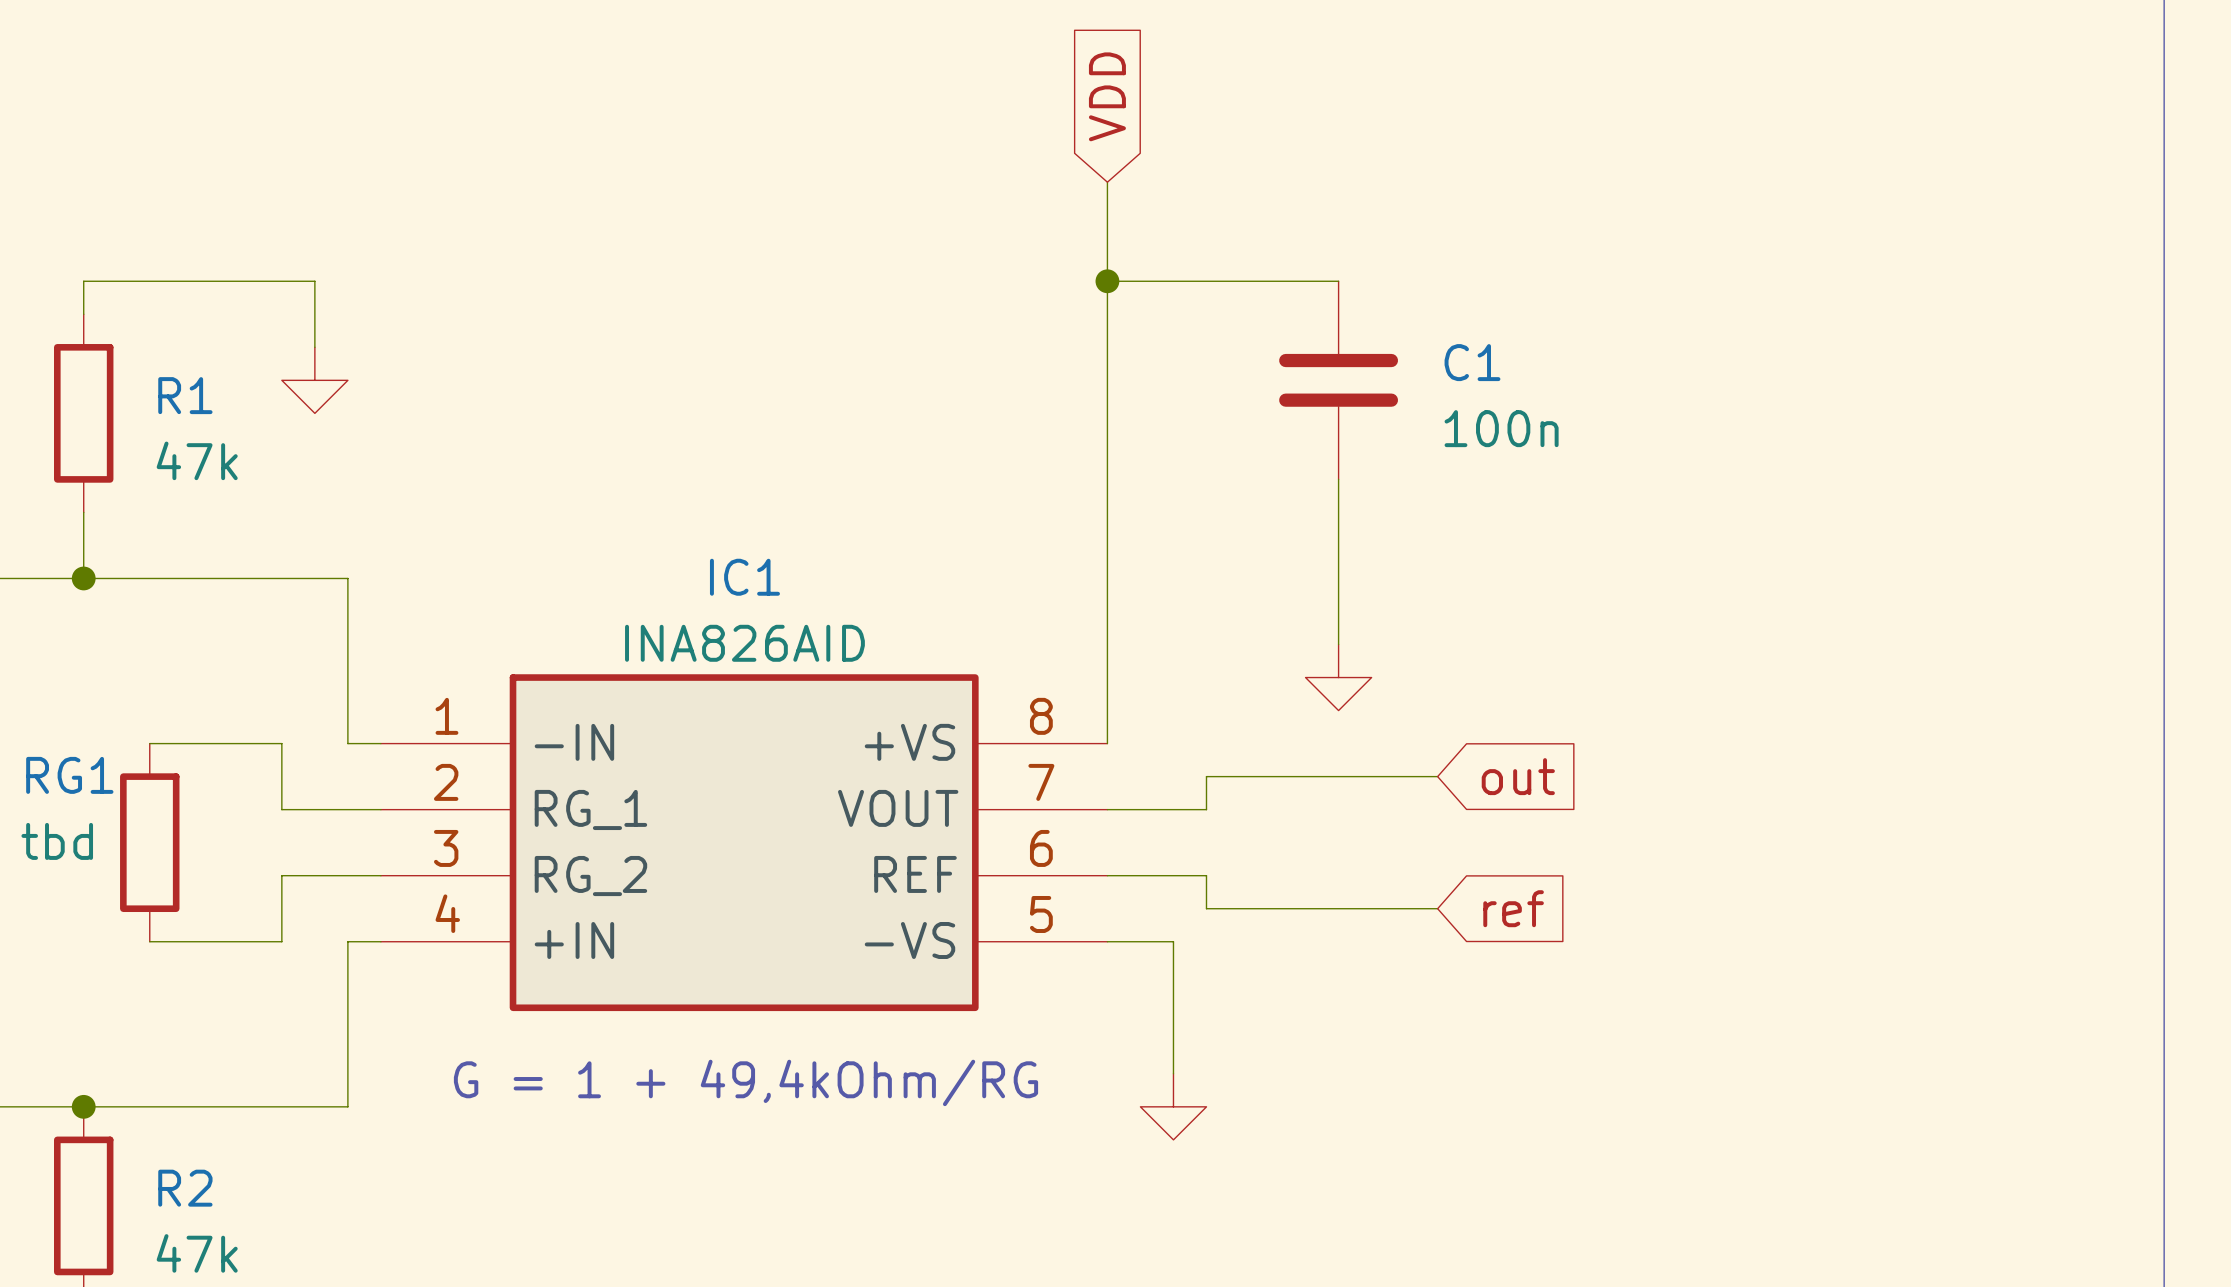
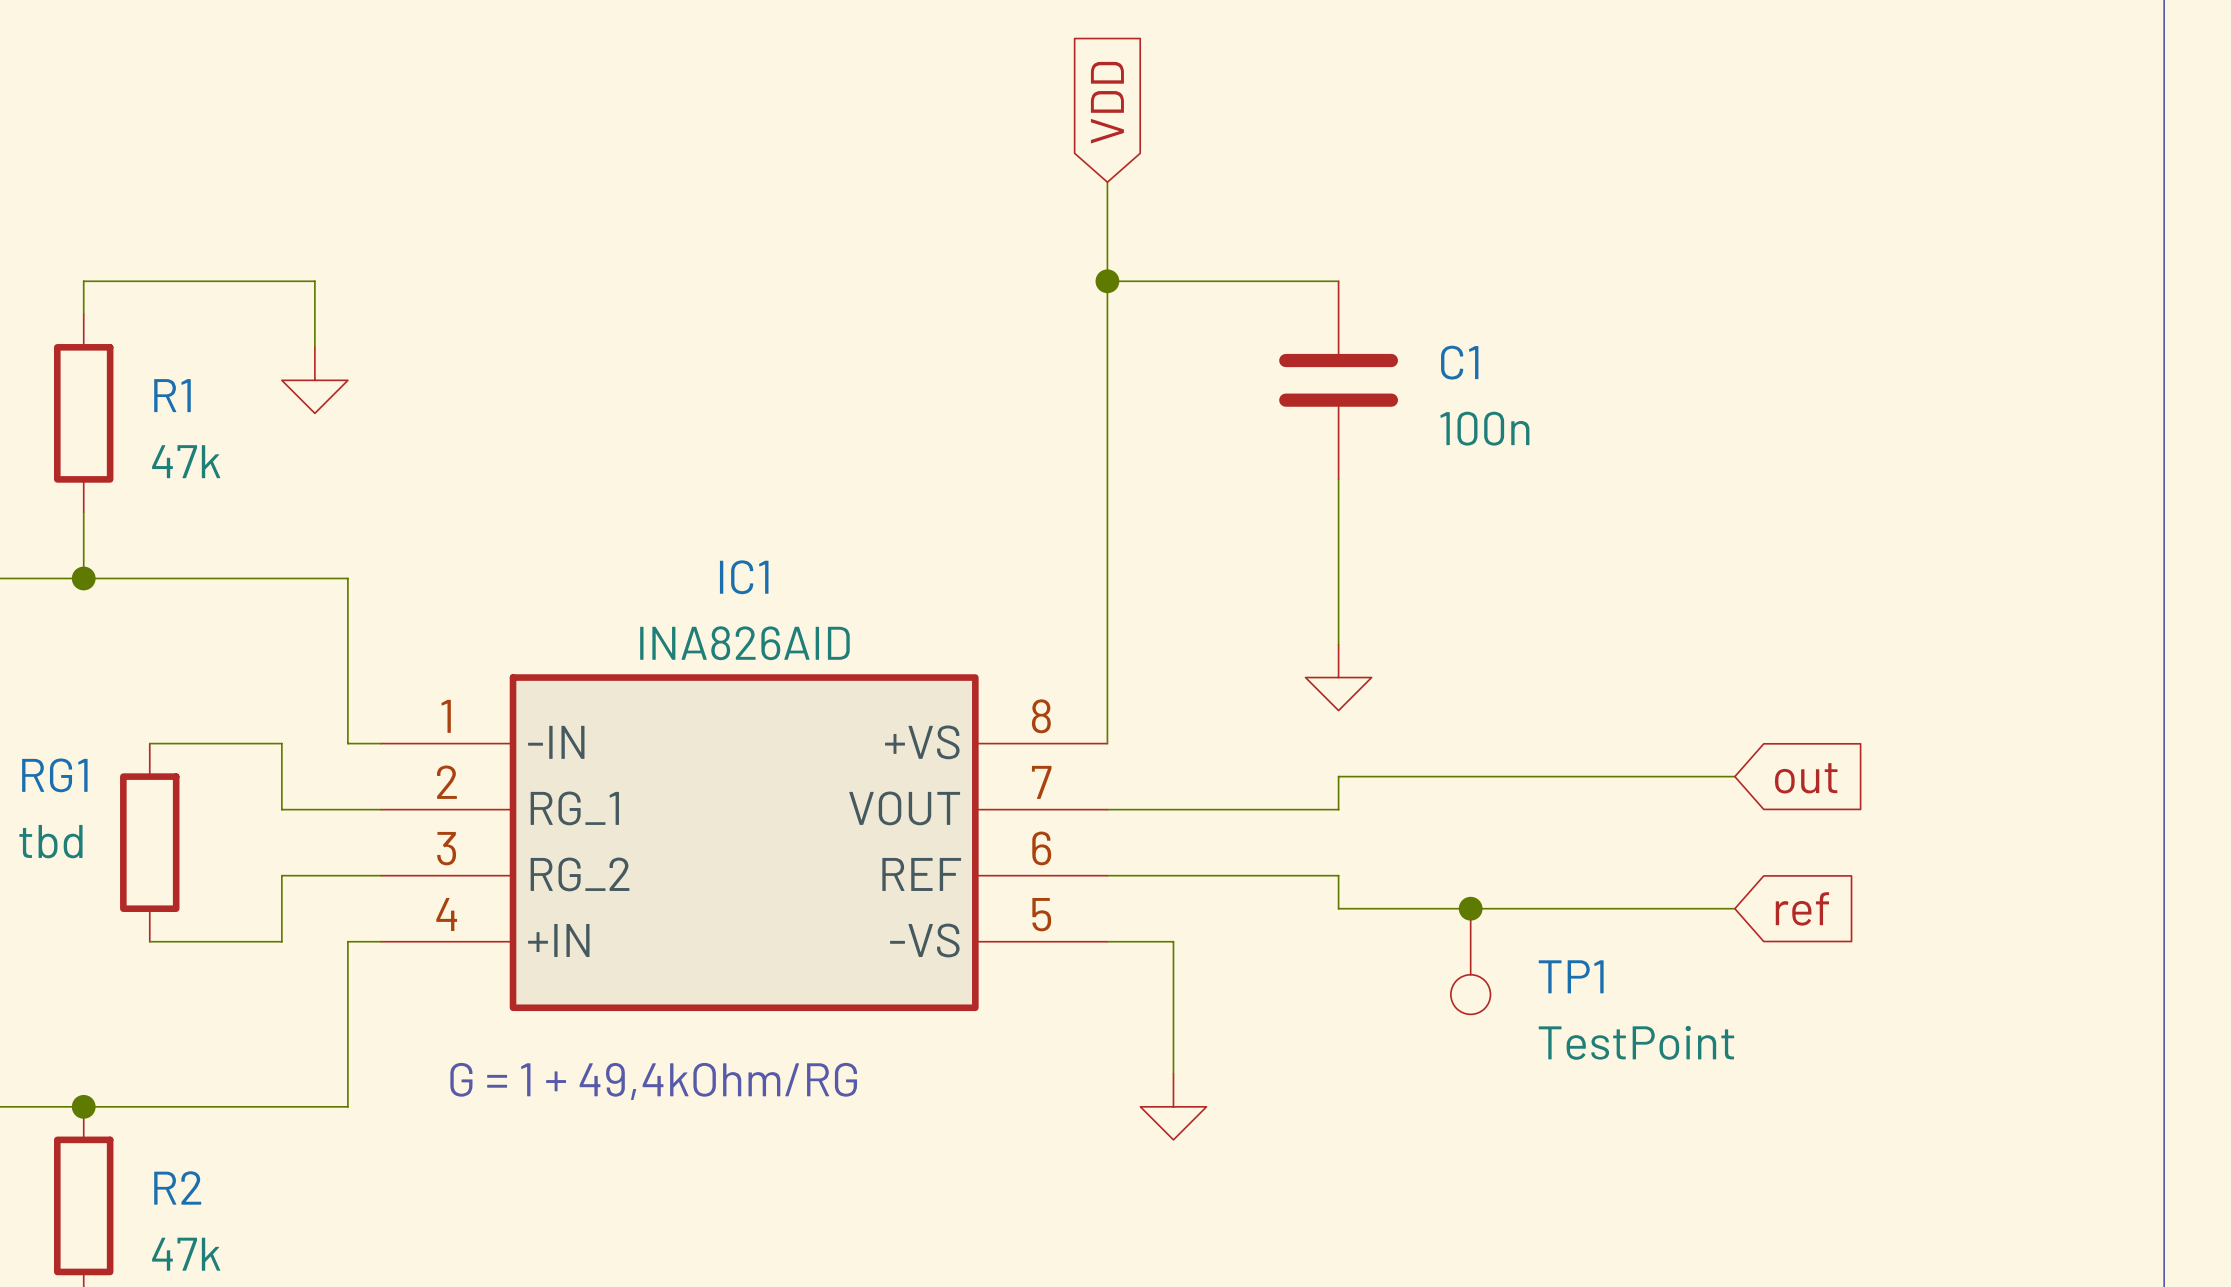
wire: (1338, 776) (1206, 776) (1206, 809) -> (1338, 776) (1338, 809) (1206, 809)
wire: none -> (1437, 776) (1734, 776)
global label position: out (1518, 776) -> out (1806, 778)
wire: (1206, 875) (1206, 908) (1338, 908) -> (1206, 875) (1338, 875) (1338, 908)
wire: none -> (1437, 908) (1734, 908)
junction: none -> (1470, 908)
global label position: ref (1513, 908) -> ref (1802, 908)
TP1: none -> TestPoint (1470, 961)

